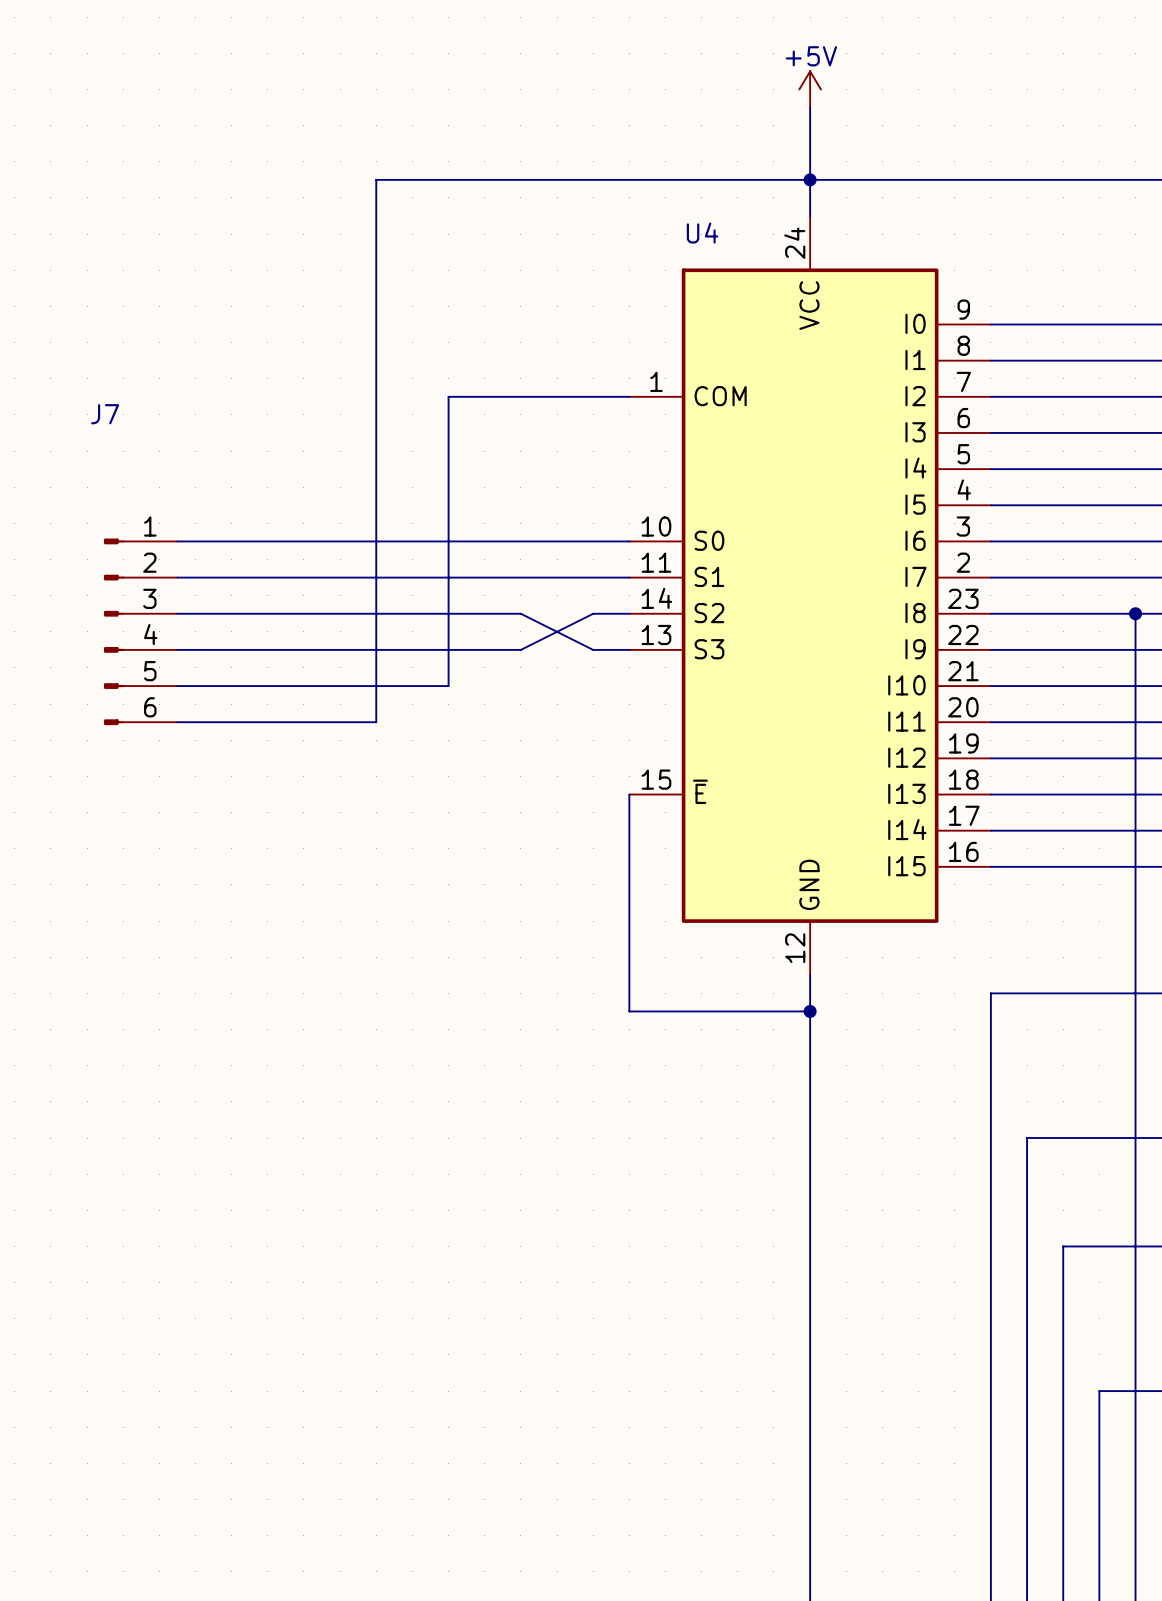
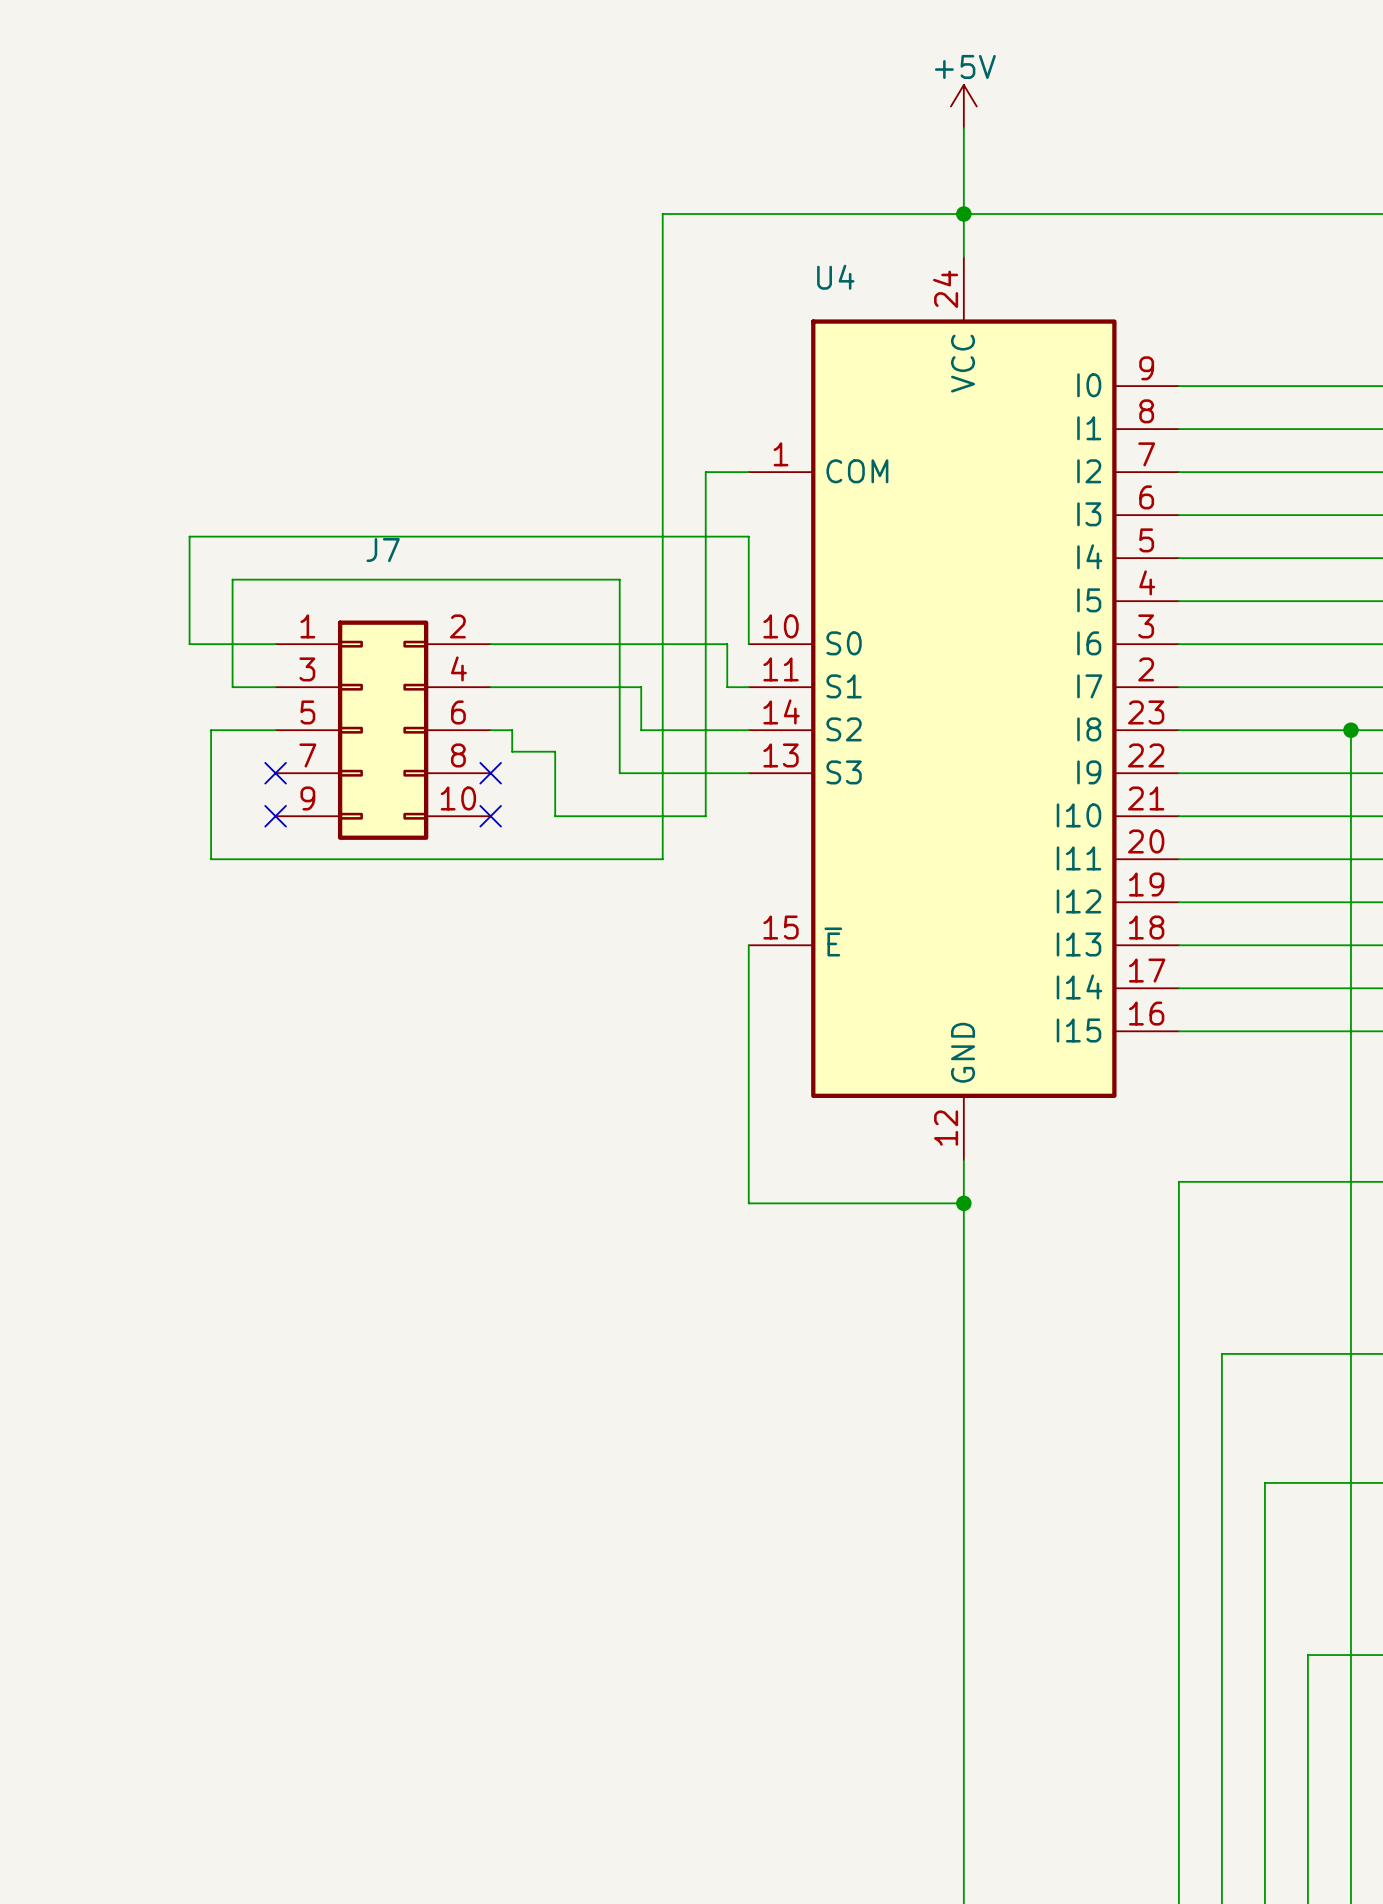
wire: (557, 179) (376, 179) (376, 722) -> (662, 214) (662, 859) (447, 859)
wire: (593, 396) (448, 396) (448, 686) (177, 686) -> (705, 472) (705, 816) (555, 816) (555, 751) (512, 751) (512, 730)
J7 name position: J7 (105, 414) -> J7 (383, 550)
J7 symbol: [104, 538, 178, 726] -> [275, 620, 491, 840]
wire: none -> (211, 644) (189, 644) (189, 536) (748, 536) (748, 644)
wire: (611, 541) (629, 541) -> (727, 644) (727, 687)
wire: (177, 577) (195, 577) -> none
wire: (538, 577) (611, 577) -> (641, 687) (641, 730) (705, 730)
wire: none -> (211, 730) (211, 859)
wire: (430, 613) (520, 613) (593, 649) -> (232, 687) (232, 579) (619, 579) (619, 773) (705, 773)
wire: (593, 613) (520, 649) (177, 649) -> none
no-connect mark: none -> (275, 773)
no-connect mark: none -> (490, 773)
no-connect mark: none -> (275, 816)
no-connect mark: none -> (490, 816)

